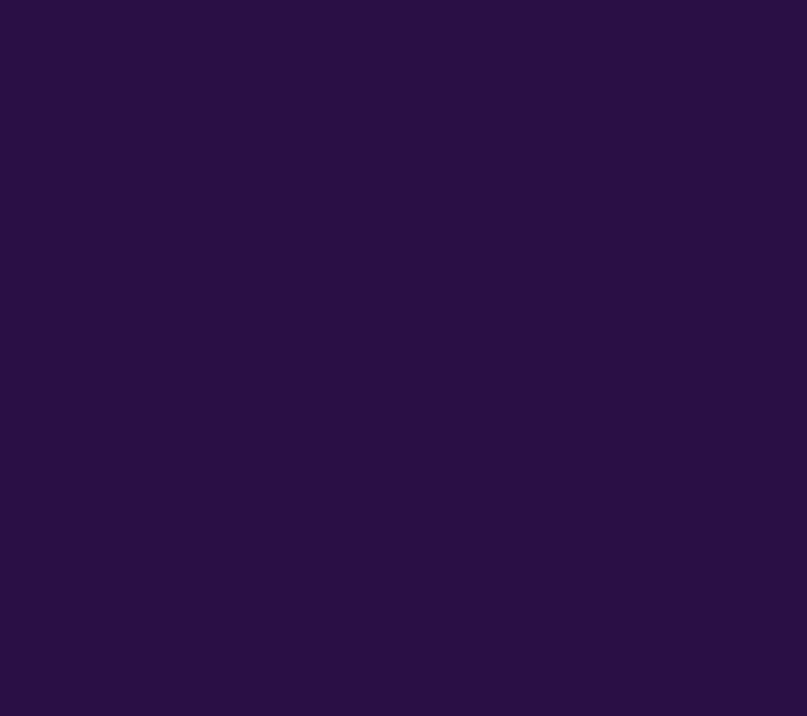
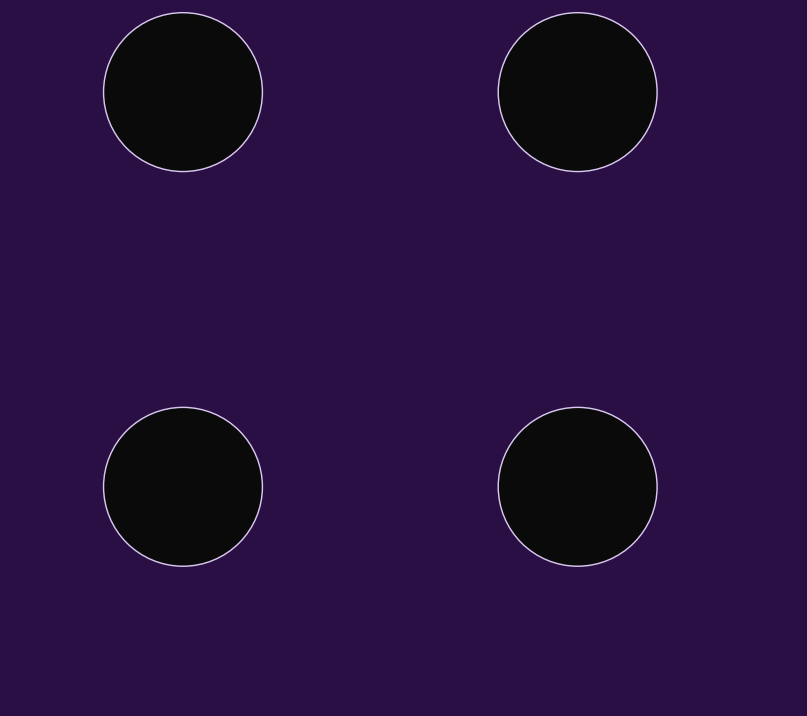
part: none -> (182, 92)
part: none -> (577, 92)
part: none -> (182, 486)
part: none -> (577, 486)

